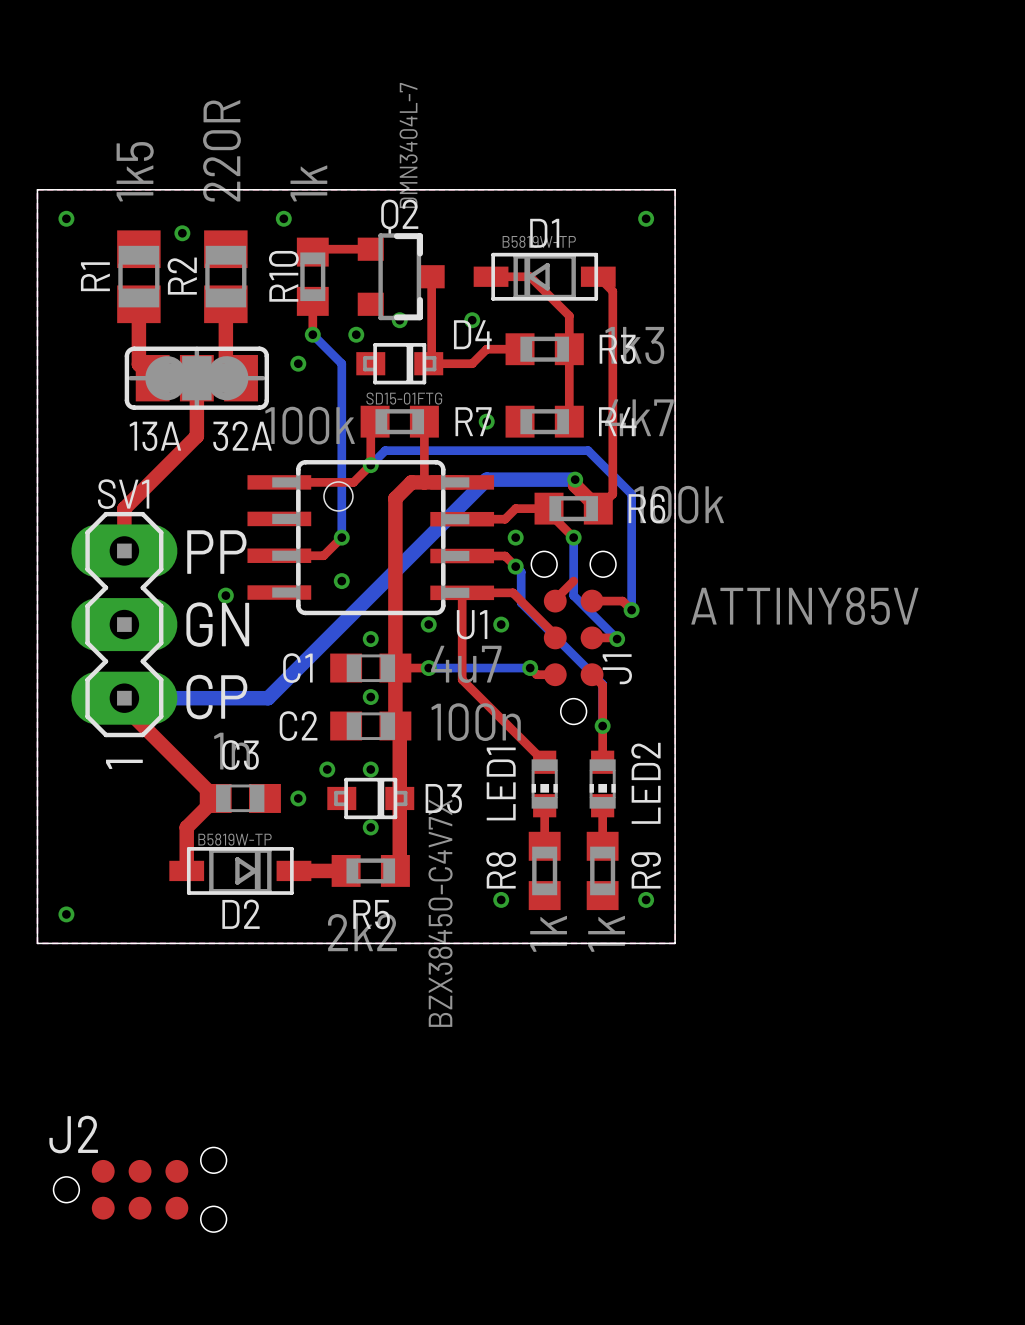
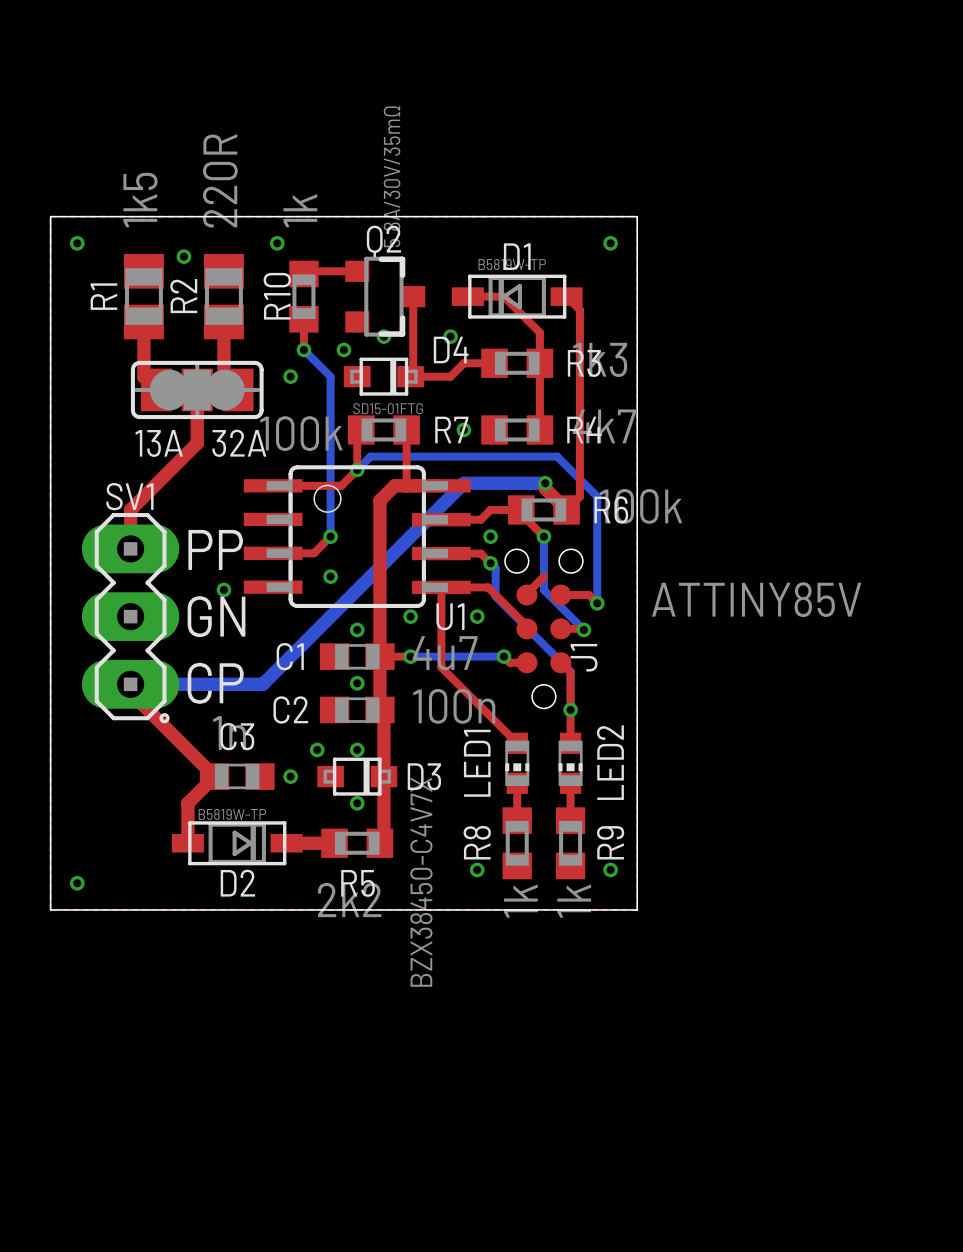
Q2 value: DMN3404L-7 (408, 145) -> 5.8A/30V/35mΩ (392, 176)
SV1 footprint: [71, 511, 178, 738] -> [81, 513, 180, 724]
J2: (140, 1189) -> none

